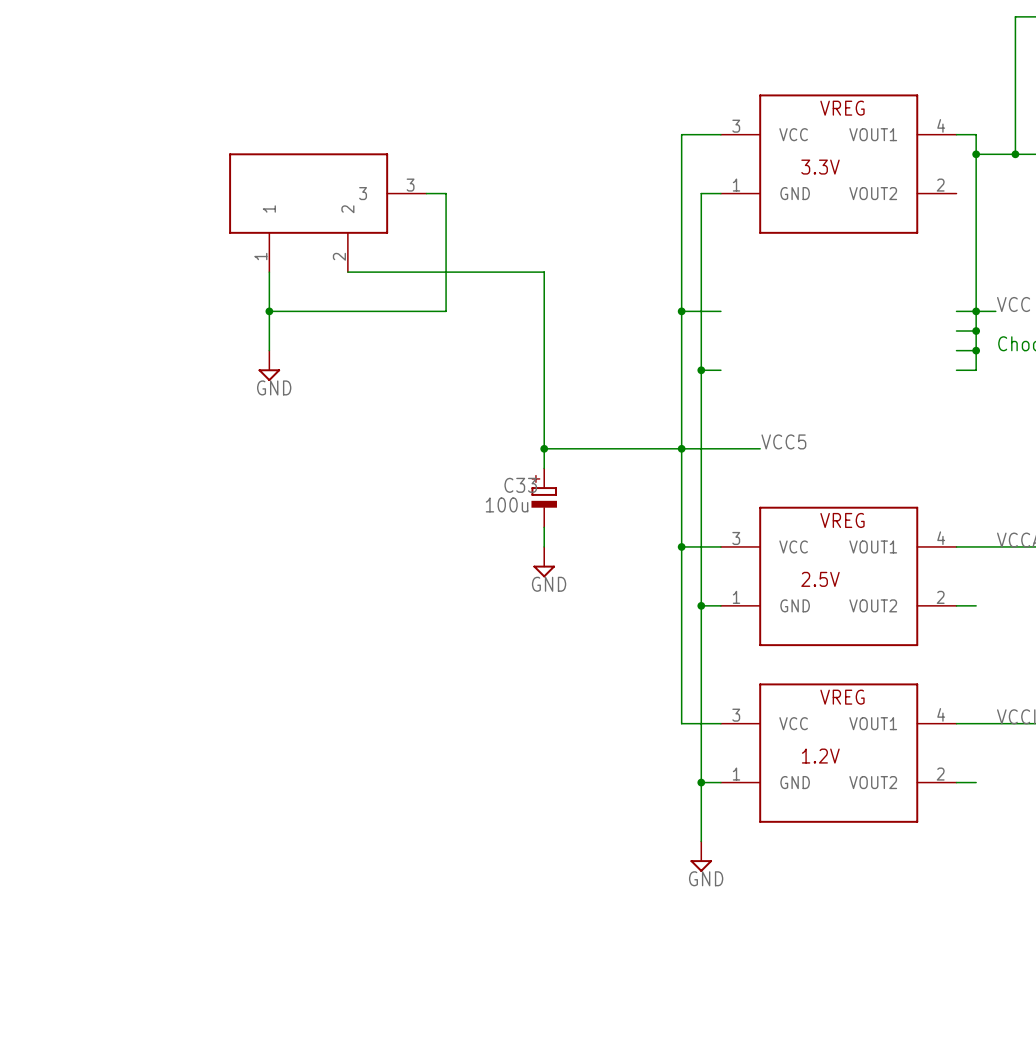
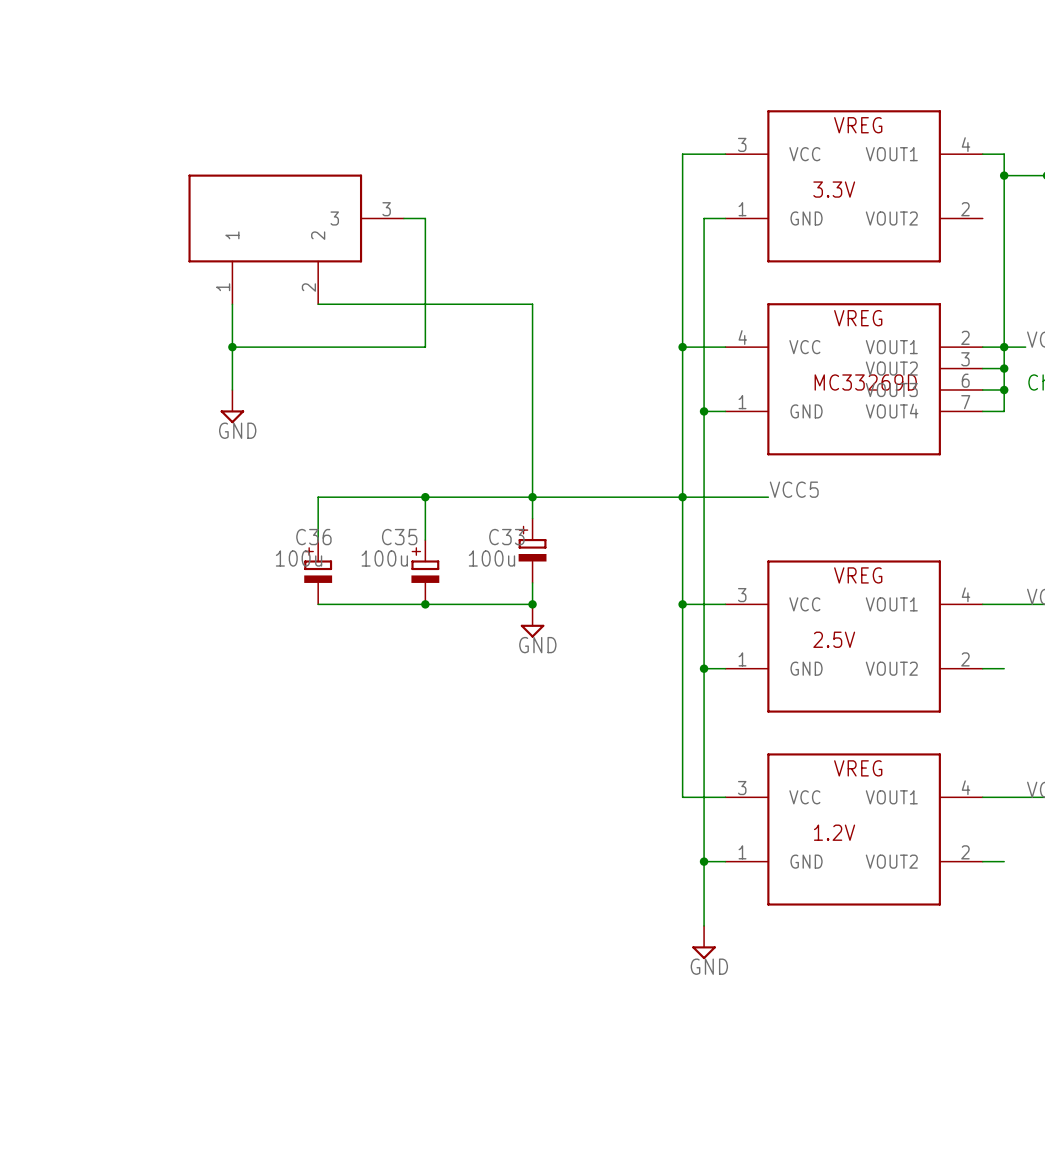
part: none -> MC33269D (854, 379)
wire: none -> (425, 497) (425, 540)
junction: none -> (425, 497)
wire: none -> (532, 497) (318, 497) (318, 540)
C36: none -> 100u (318, 572)
C35: none -> 100u (425, 572)
wire: none -> (318, 604) (532, 604)
junction: none -> (425, 604)
junction: none -> (532, 604)

